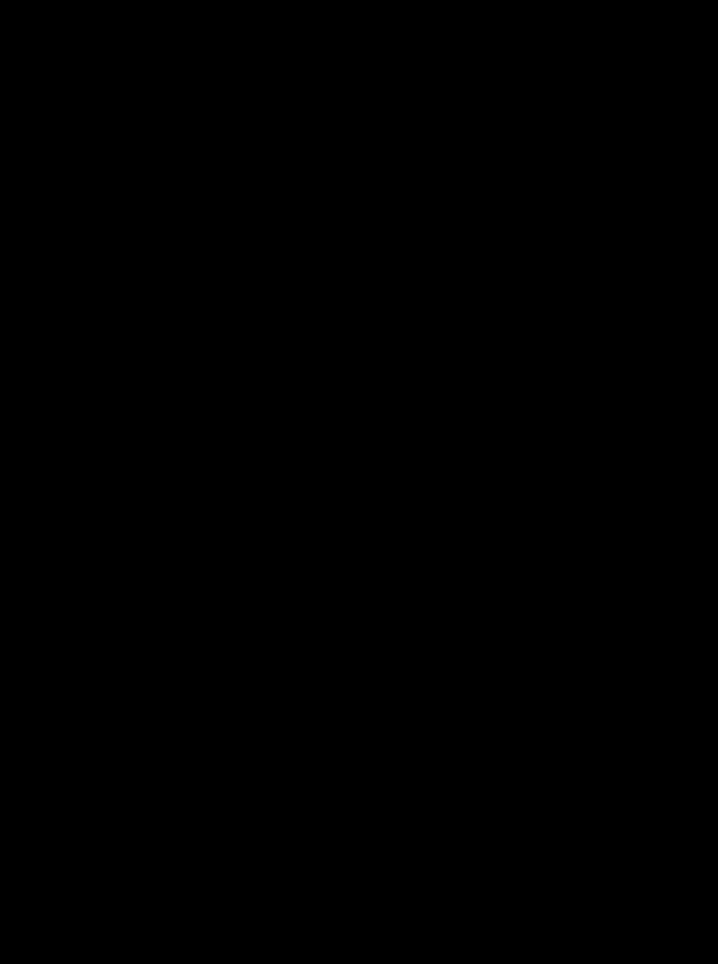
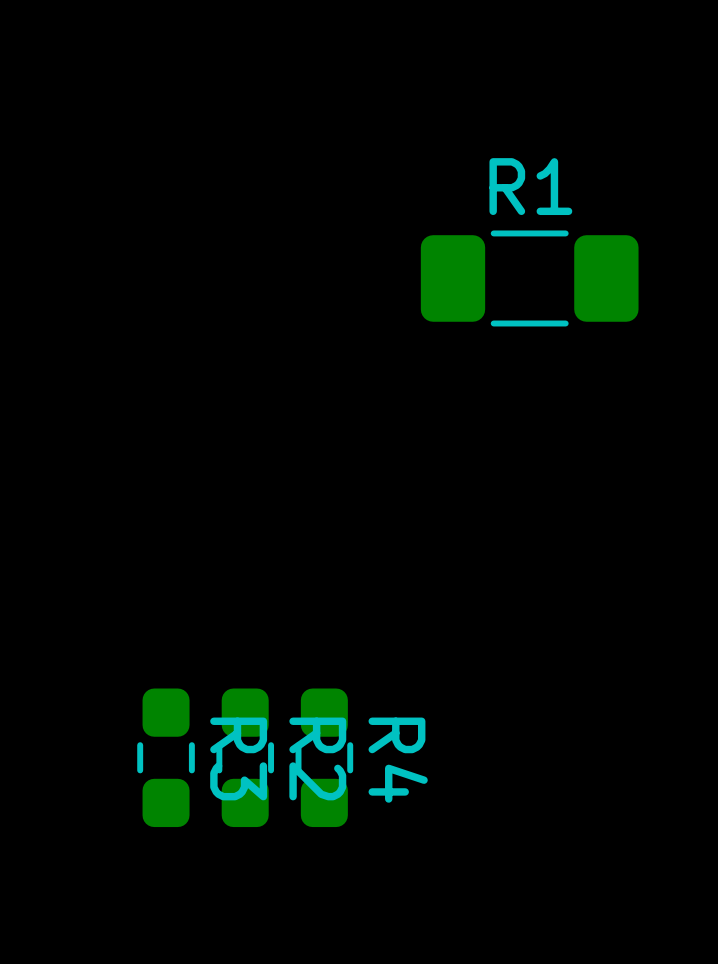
R1: none -> (529, 278)
R3: none -> (166, 757)
R2: none -> (245, 757)
R4: none -> (324, 757)

